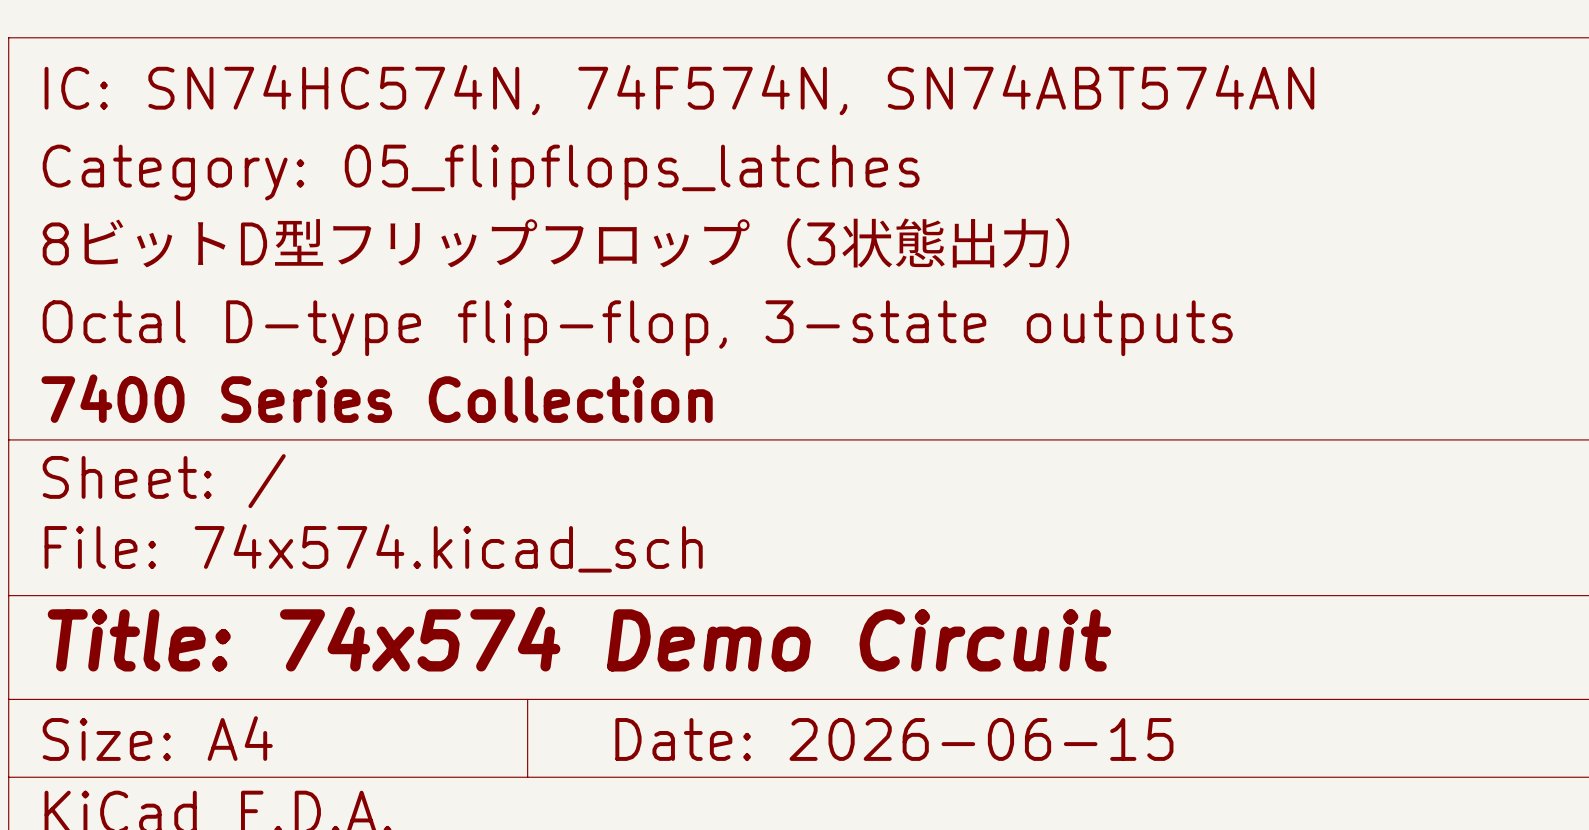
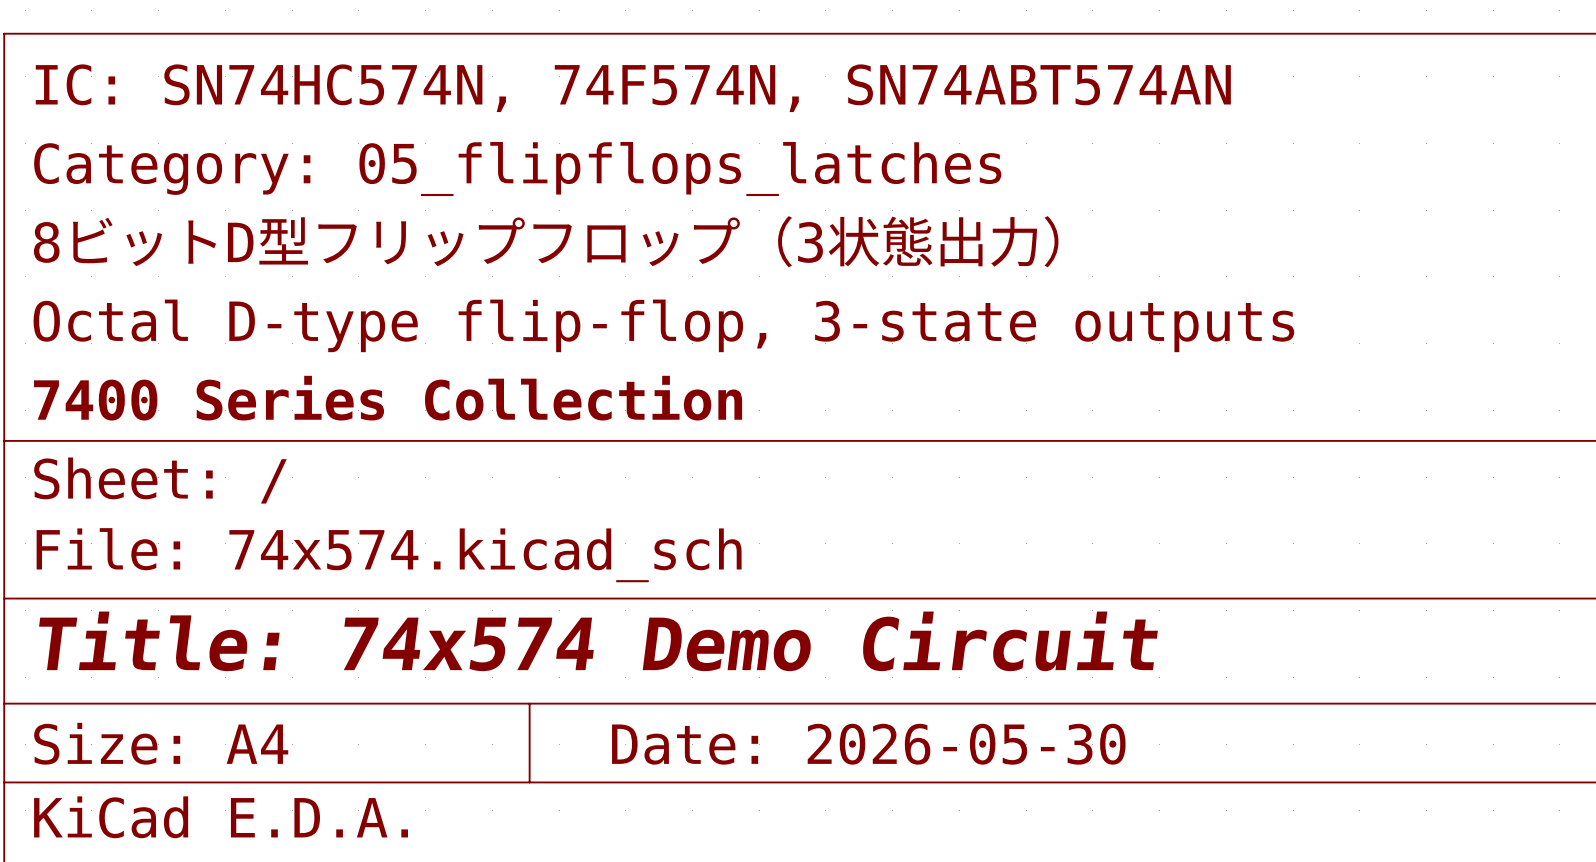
title block: Date: 2026-06-15 (894, 739) -> Date: 2026-05-30 (868, 744)

